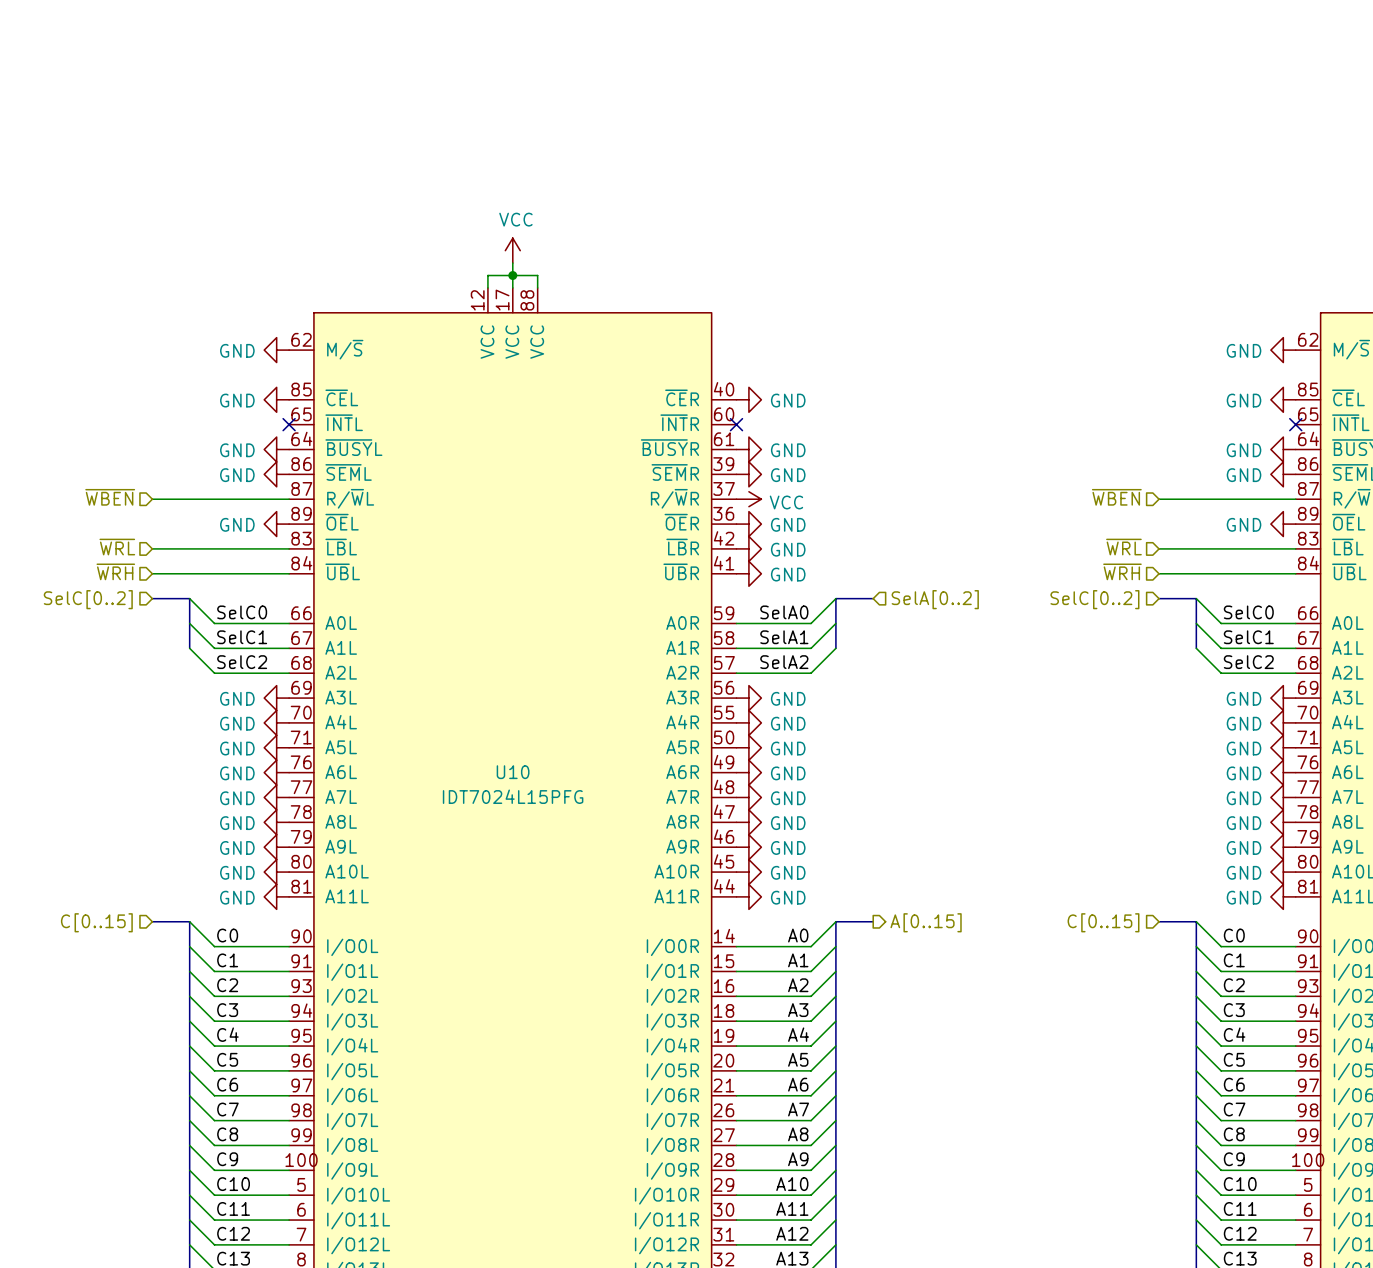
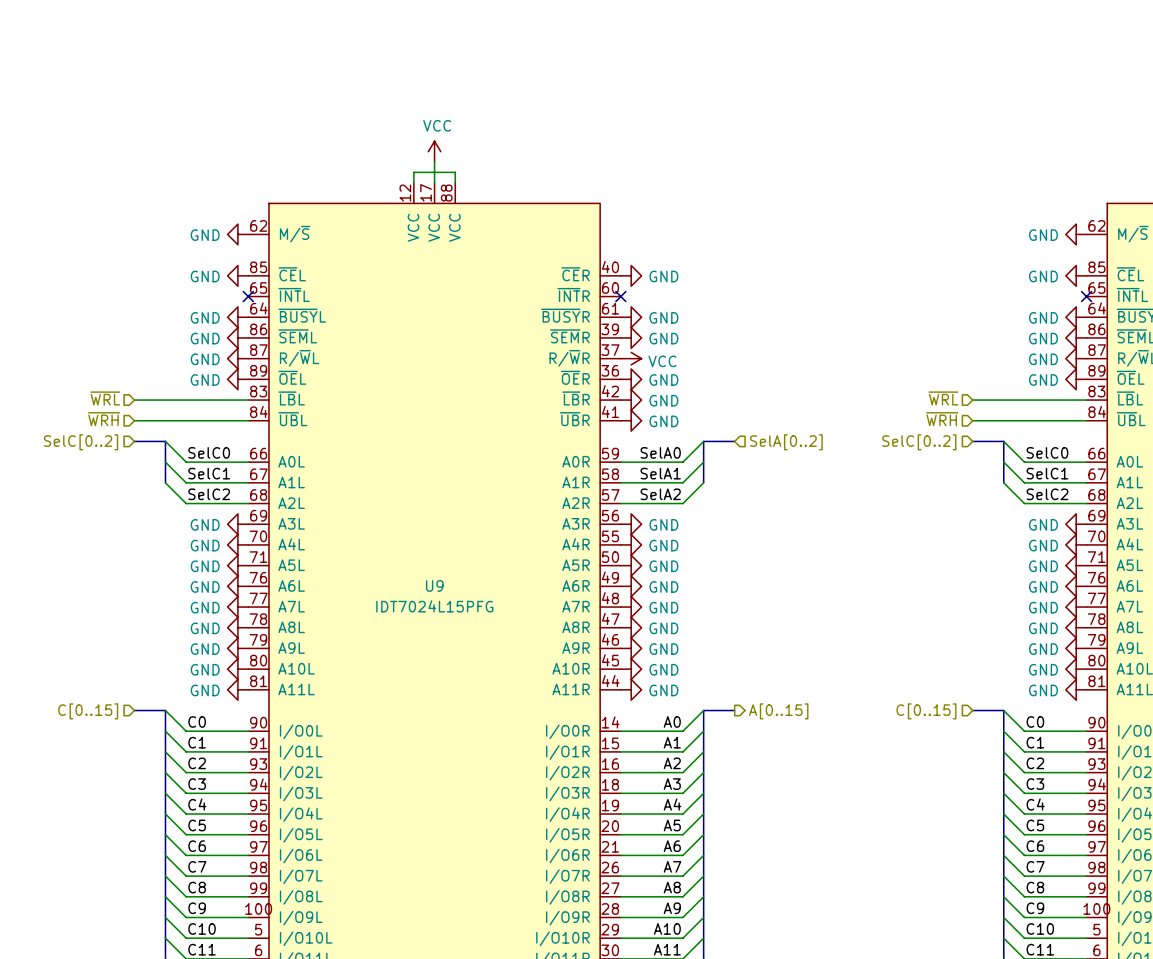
junction: (512, 275) -> none
hierarchical label: ~{WBEN} (110, 497) -> none
hierarchical label: ~{WBEN} (1116, 497) -> none
wire: (152, 499) (289, 499) -> none
power symbol: none -> GND (237, 358)
wire: (1159, 499) (1295, 499) -> none
power symbol: none -> GND (1076, 358)
U10 name: U10 (513, 772) -> U9 (434, 585)

